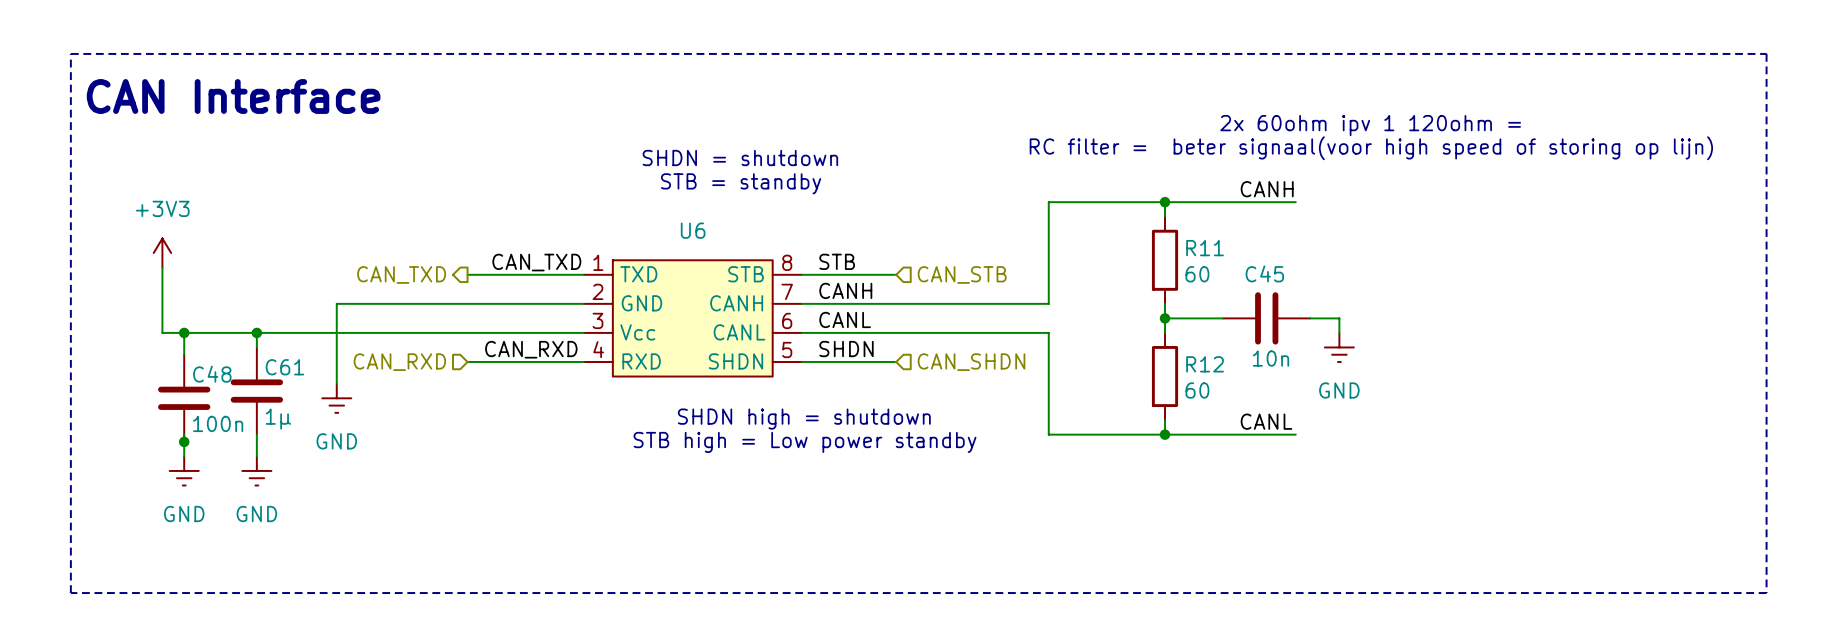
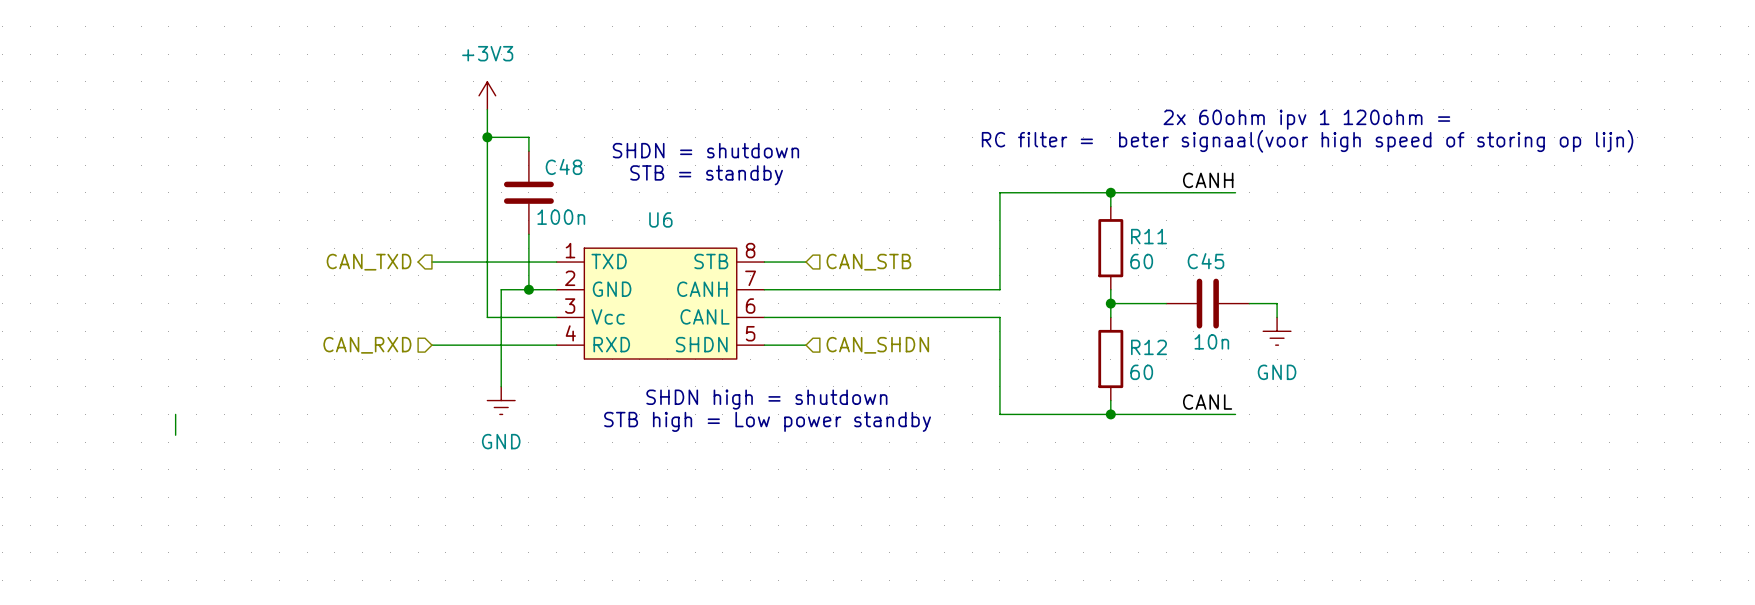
line: (70, 53) (1766, 53) (1766, 593) (70, 593) (70, 53) -> none
text: CAN Interface (233, 96) -> none
power symbol: none -> +3V3 (487, 95)
wire: none -> (487, 137) (528, 137) (528, 151)
junction: none -> (487, 137)
wire: none -> (528, 234) (528, 289)
power symbol: +3V3 (162, 253) -> none
label: STB (837, 261) -> none
label: CAN_TXD (536, 262) -> none
wire: (162, 267) (162, 332) (511, 332) -> (487, 109) (487, 317)
hierarchical label position: CAN_TXD (401, 274) -> CAN_TXD (369, 262)
wire: none -> (431, 262) (445, 262)
wire: (845, 274) (896, 274) -> none
hierarchical label position: CAN_STB (962, 274) -> CAN_STB (868, 262)
label: CANH (845, 290) -> none
wire: (525, 303) (336, 303) (336, 383) -> (501, 289) (501, 386)
junction: none -> (528, 289)
label: CANL (845, 319) -> none
wire: (184, 332) (184, 354) -> none
junction: (184, 332) -> none
wire: (256, 332) (256, 347) -> none
junction: (256, 332) -> none
label: CAN_RXD (531, 349) -> none
label: SHDN (846, 349) -> none
wire: none -> (431, 345) (445, 345)
wire: (845, 361) (896, 361) -> none
hierarchical label position: CAN_RXD (399, 362) -> CAN_RXD (367, 345)
hierarchical label position: CAN_SHDN (971, 362) -> CAN_SHDN (877, 345)
C48 name position: C48 (212, 374) -> C48 (563, 166)
C61: 1µ (256, 391) -> none
C48 position: (184, 398) -> (528, 192)
power symbol: GND (336, 398) -> none
power symbol: none -> GND (501, 400)
wire: (256, 434) (256, 456) -> none
junction: (184, 441) -> none
power symbol: GND (184, 470) -> none
power symbol: GND (256, 470) -> none

